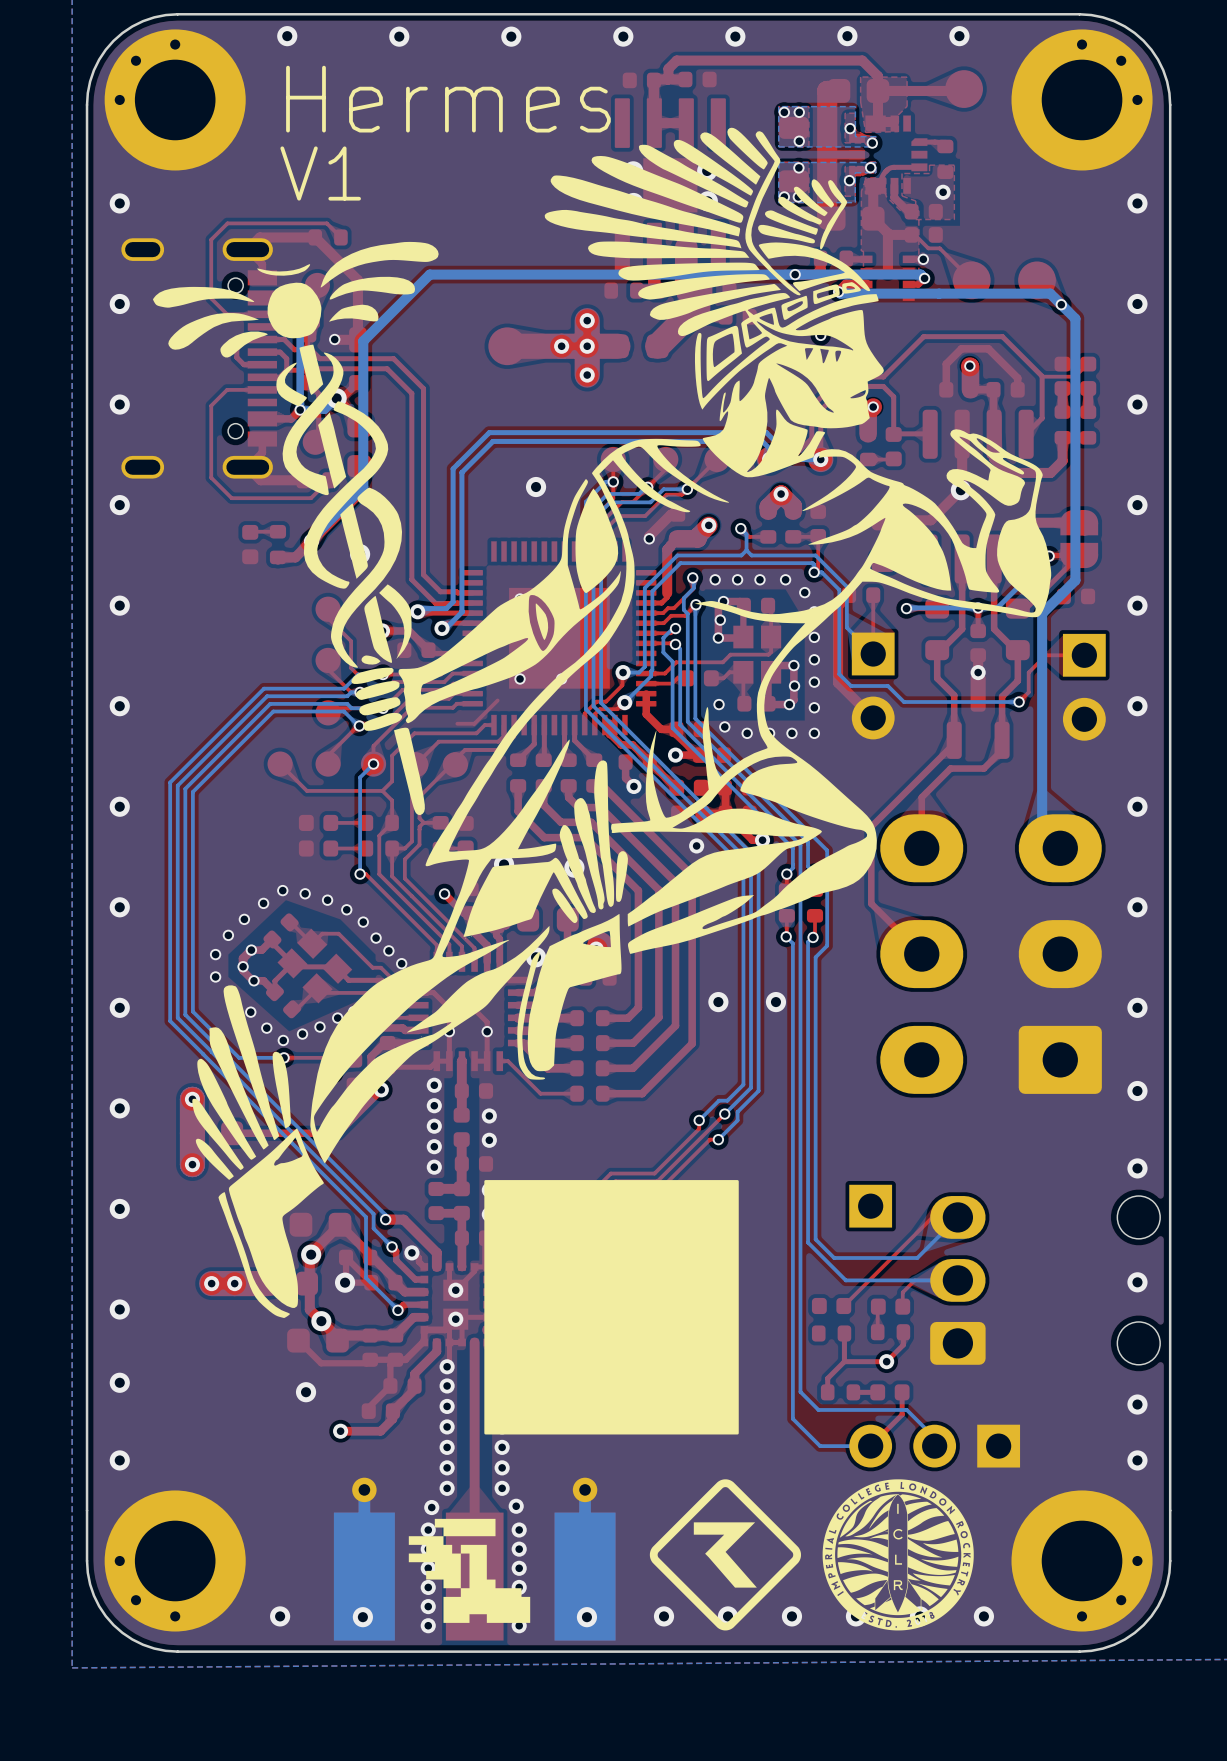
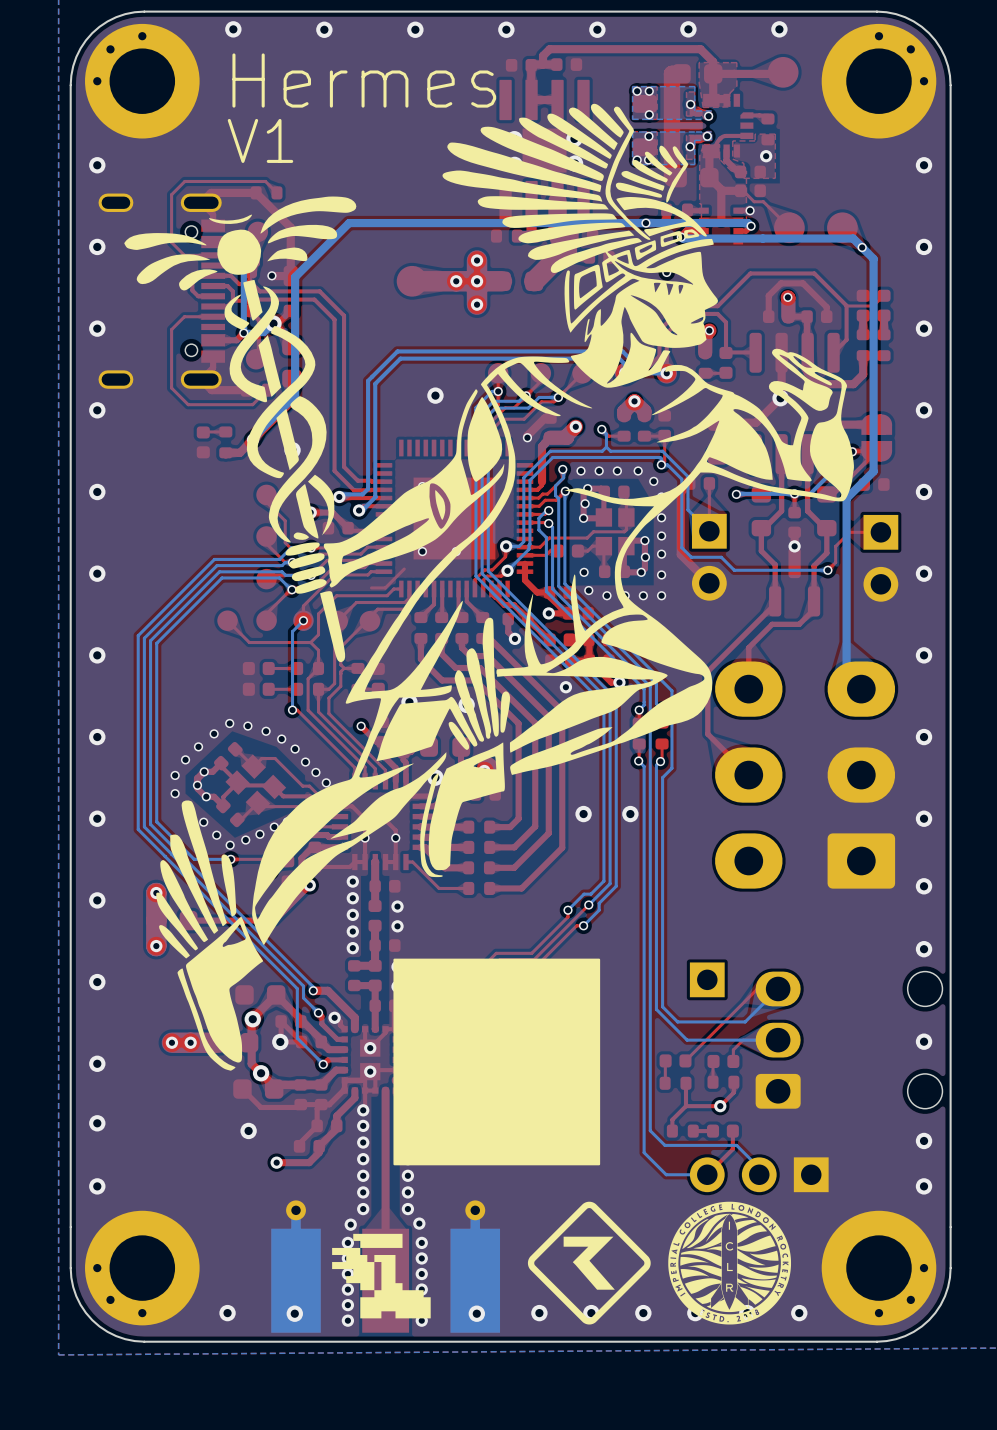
top track: none -> (665, 1061) (665, 1083)

